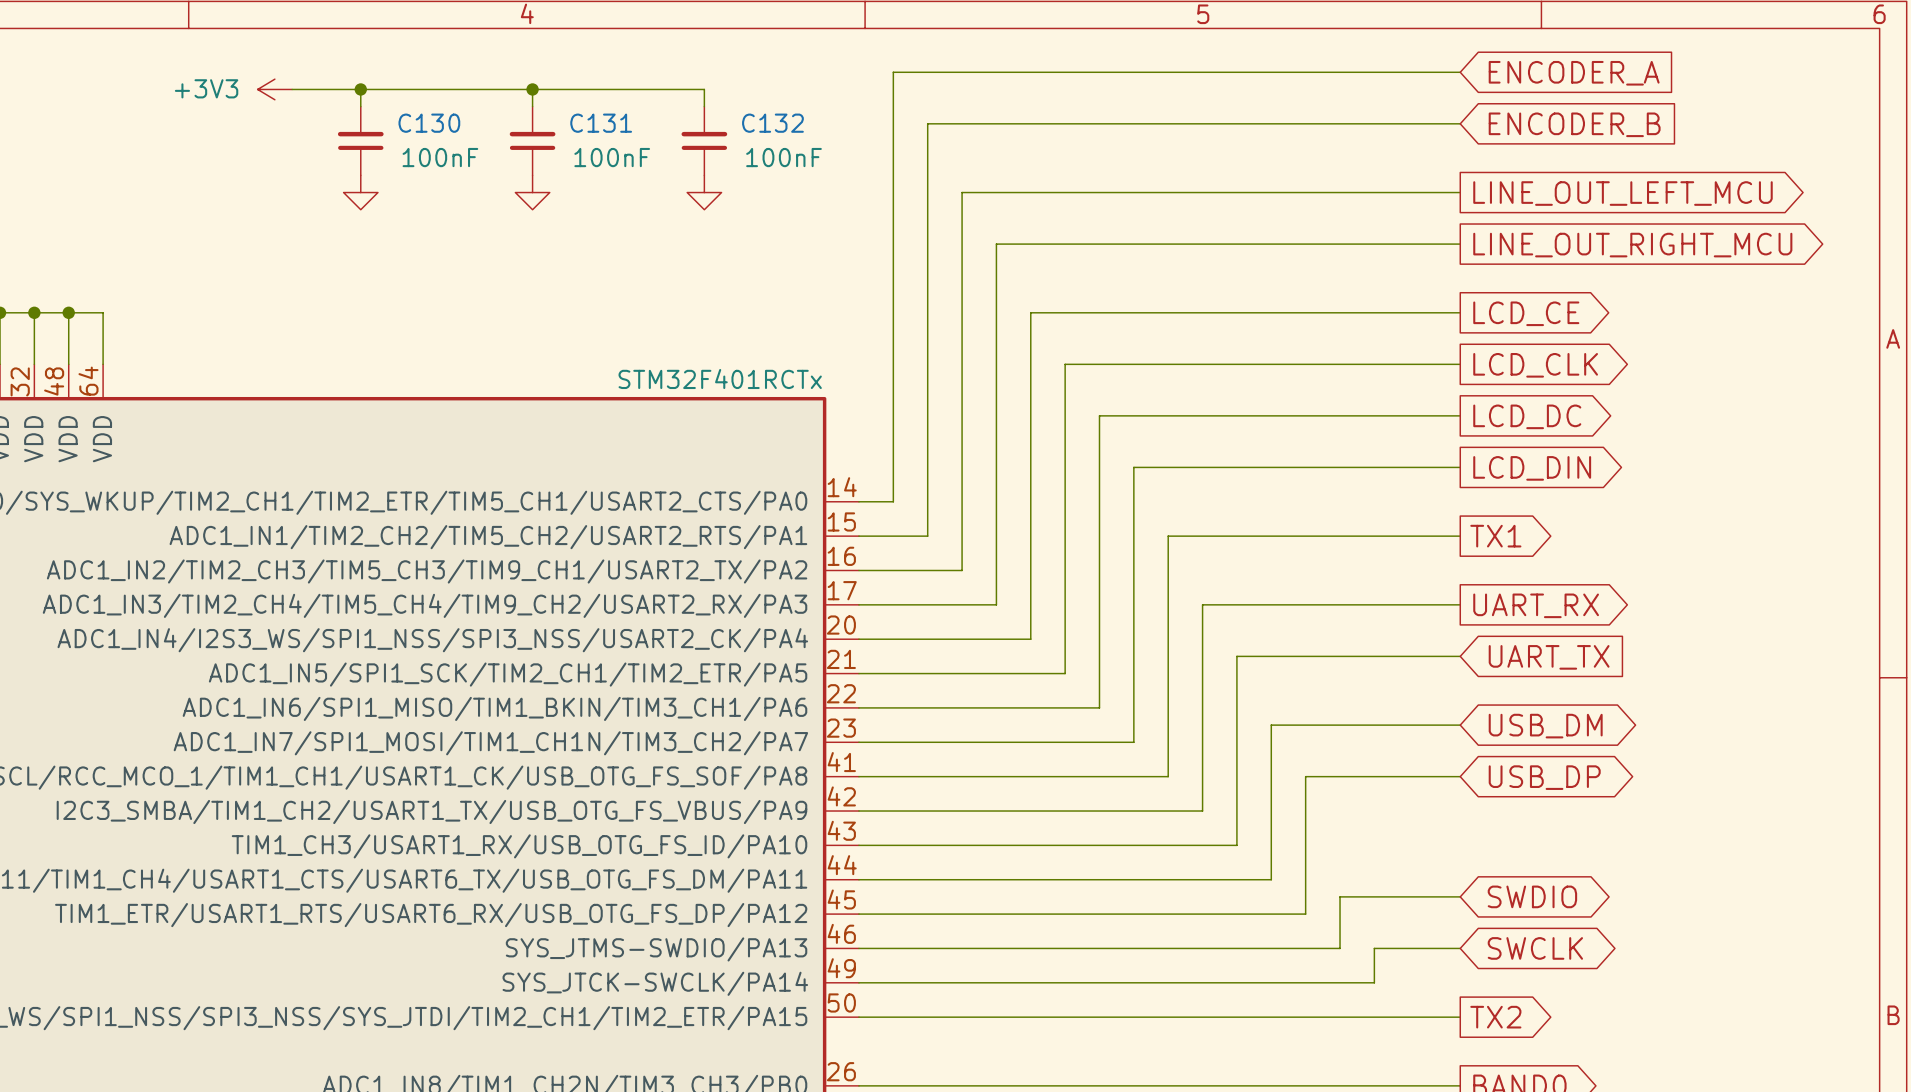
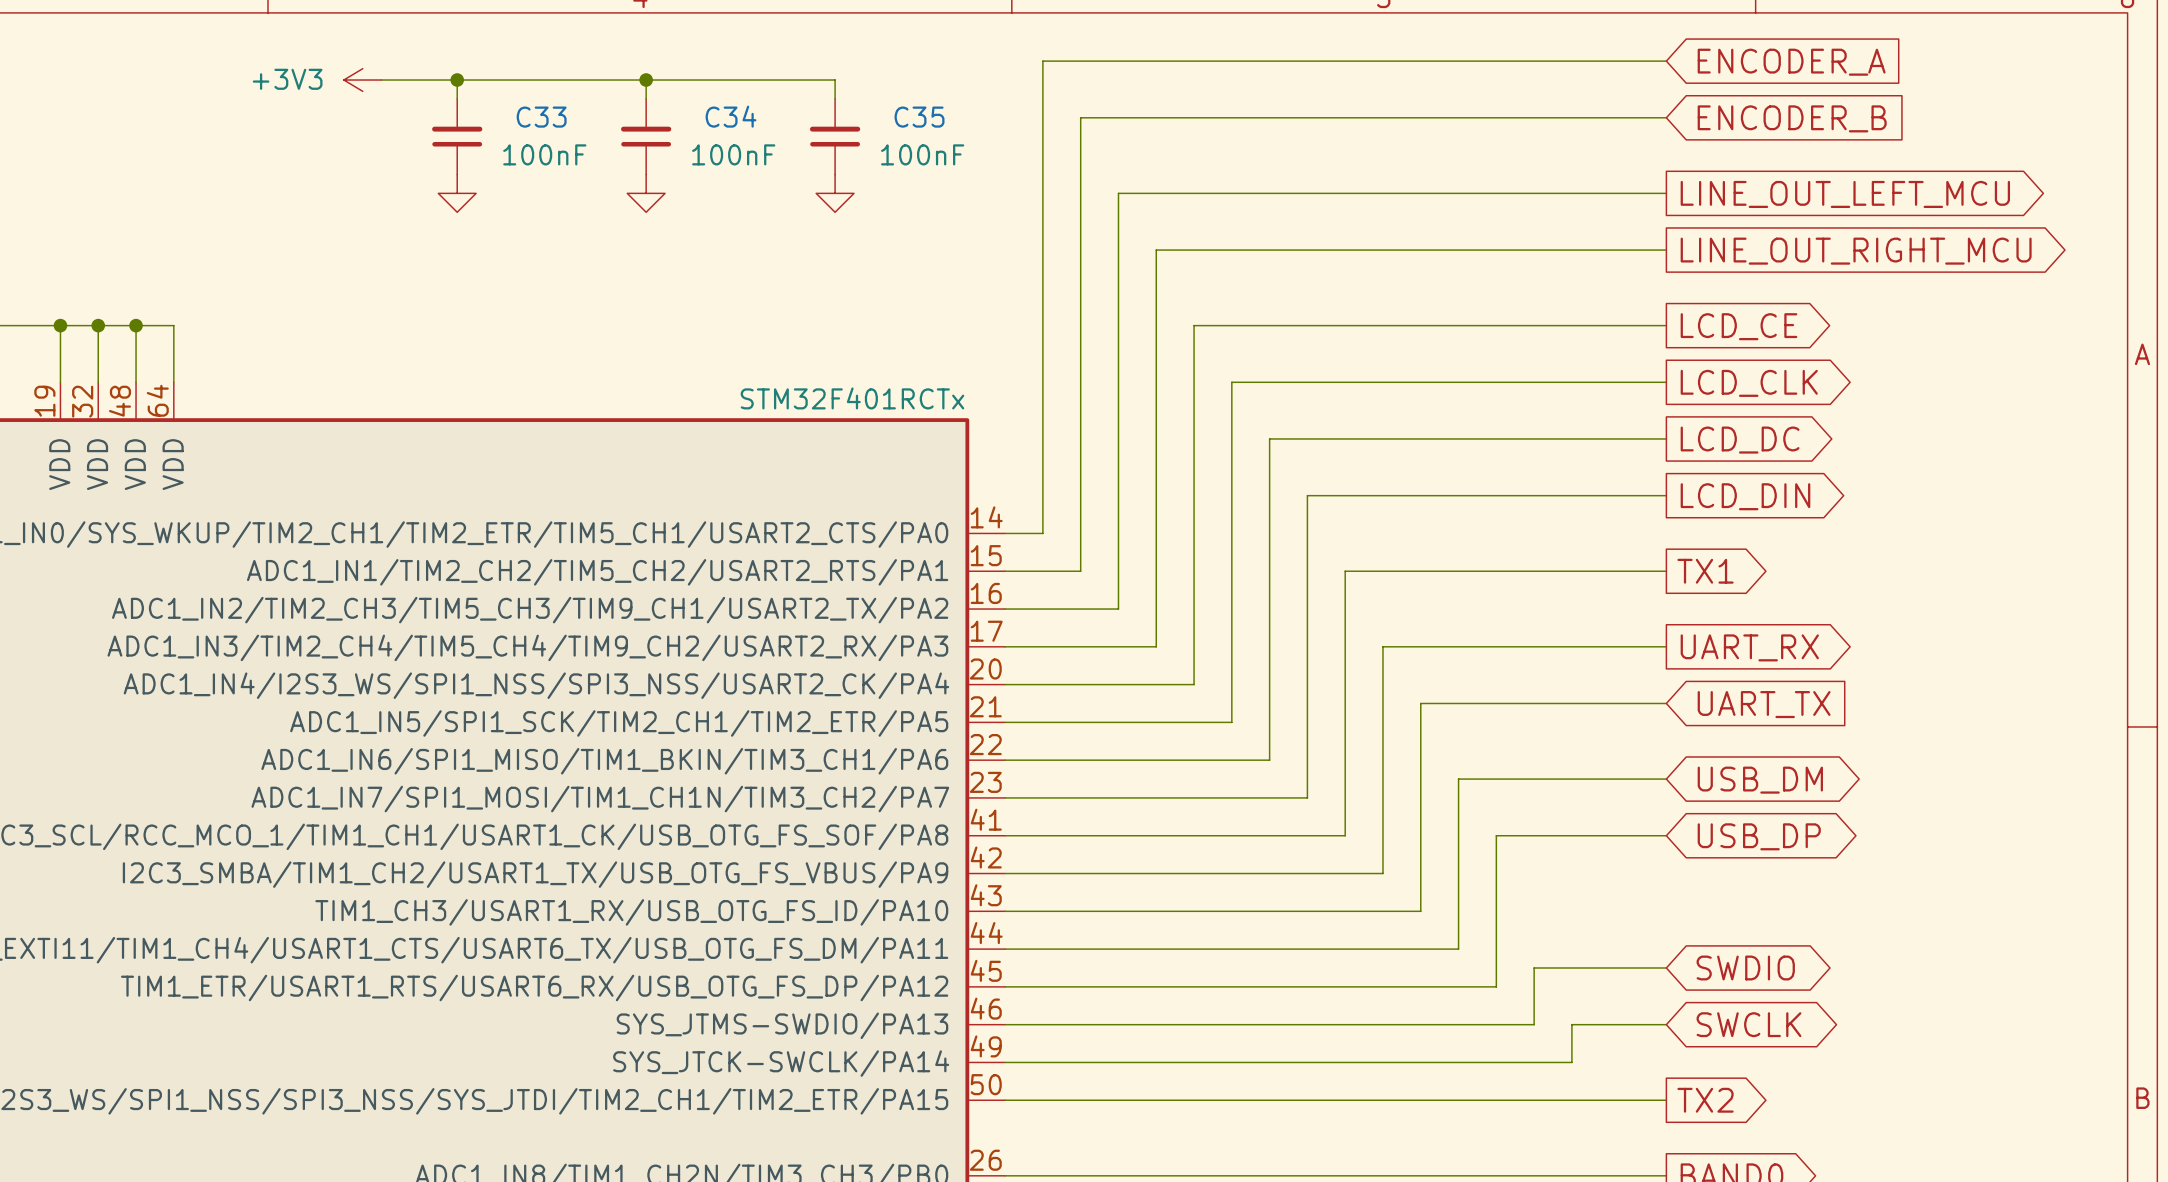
C130 name: C130 (429, 123) -> C33 (541, 117)
C131 name: C131 (601, 123) -> C34 (731, 116)
C132 name: C132 (772, 123) -> C35 (919, 117)

